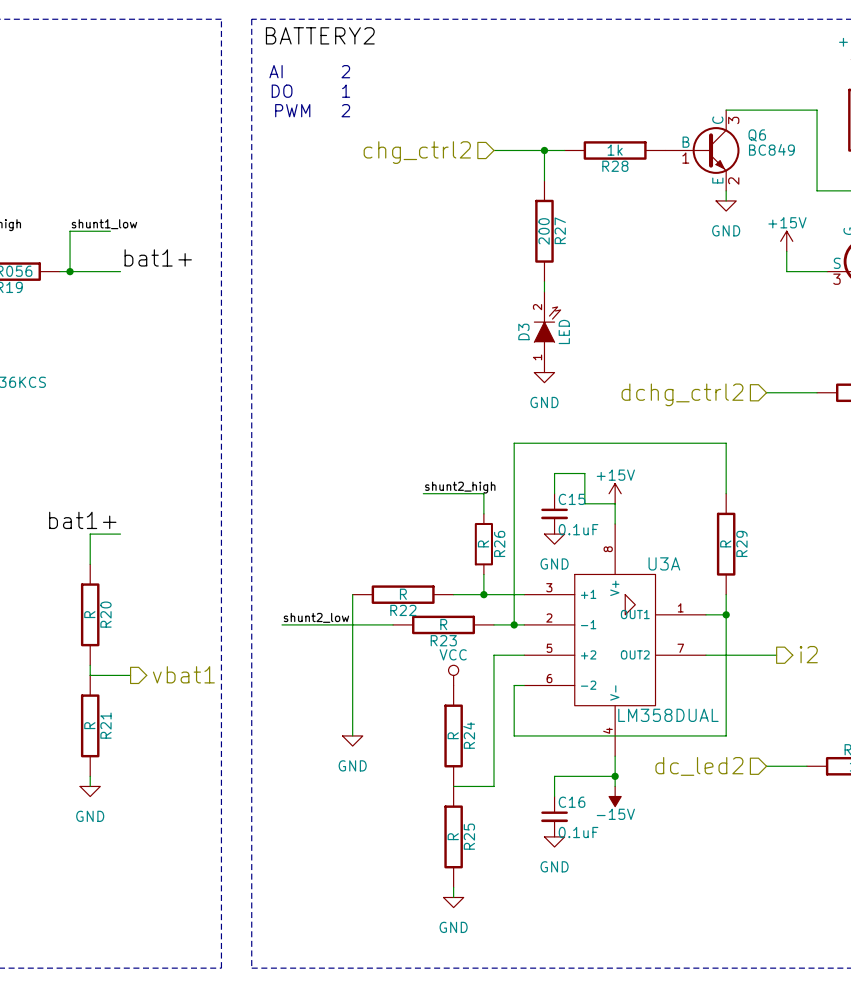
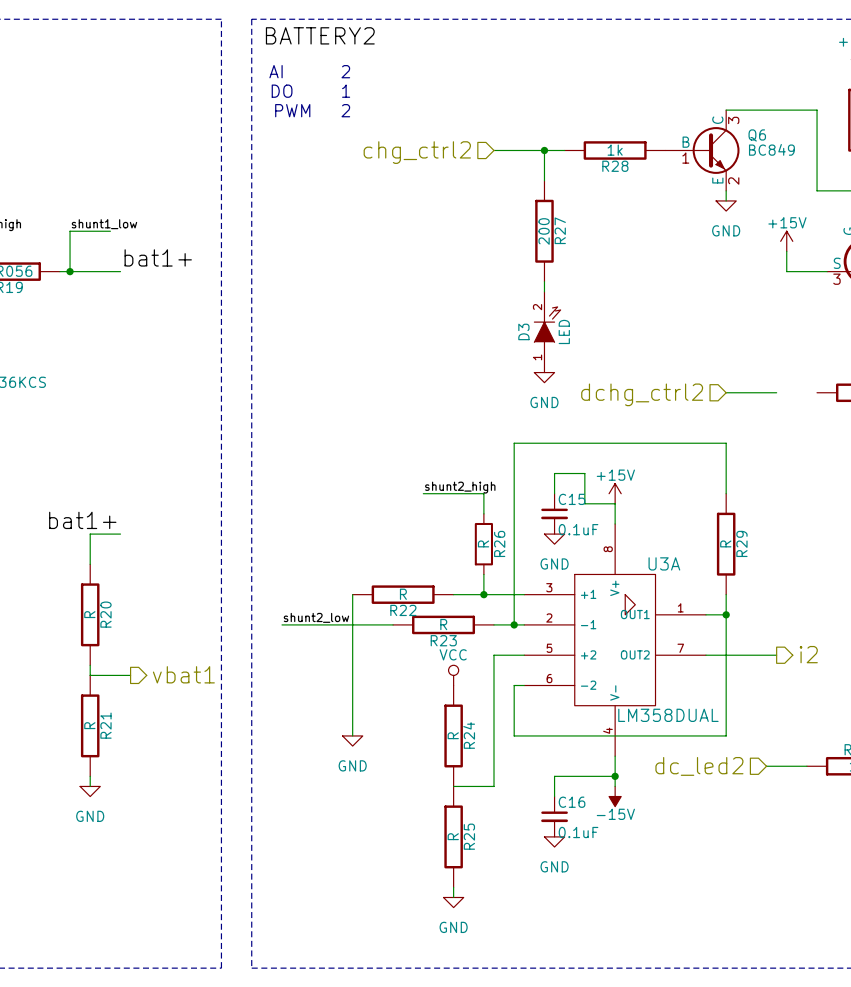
wire: (776, 392) (817, 392) -> (726, 392) (766, 392)
hierarchical label position: dchg_ctrl2 (682, 394) -> dchg_ctrl2 (642, 394)

